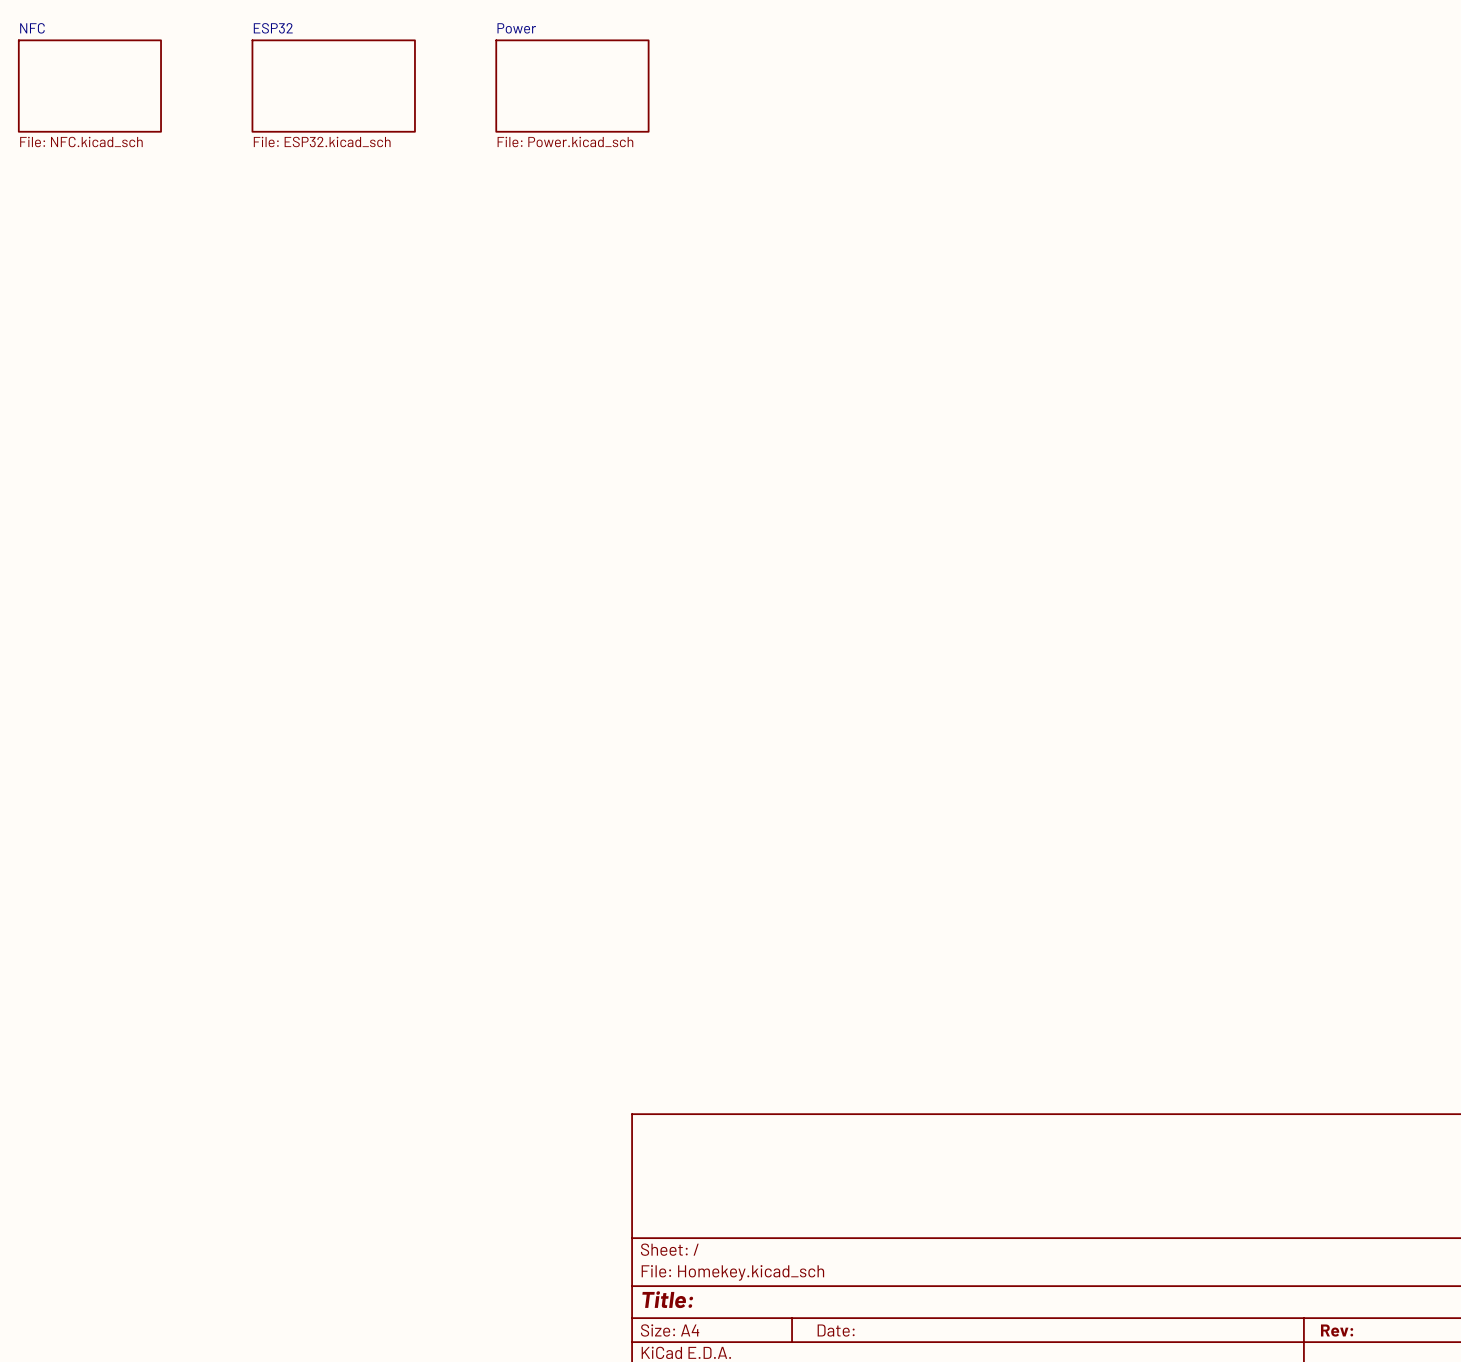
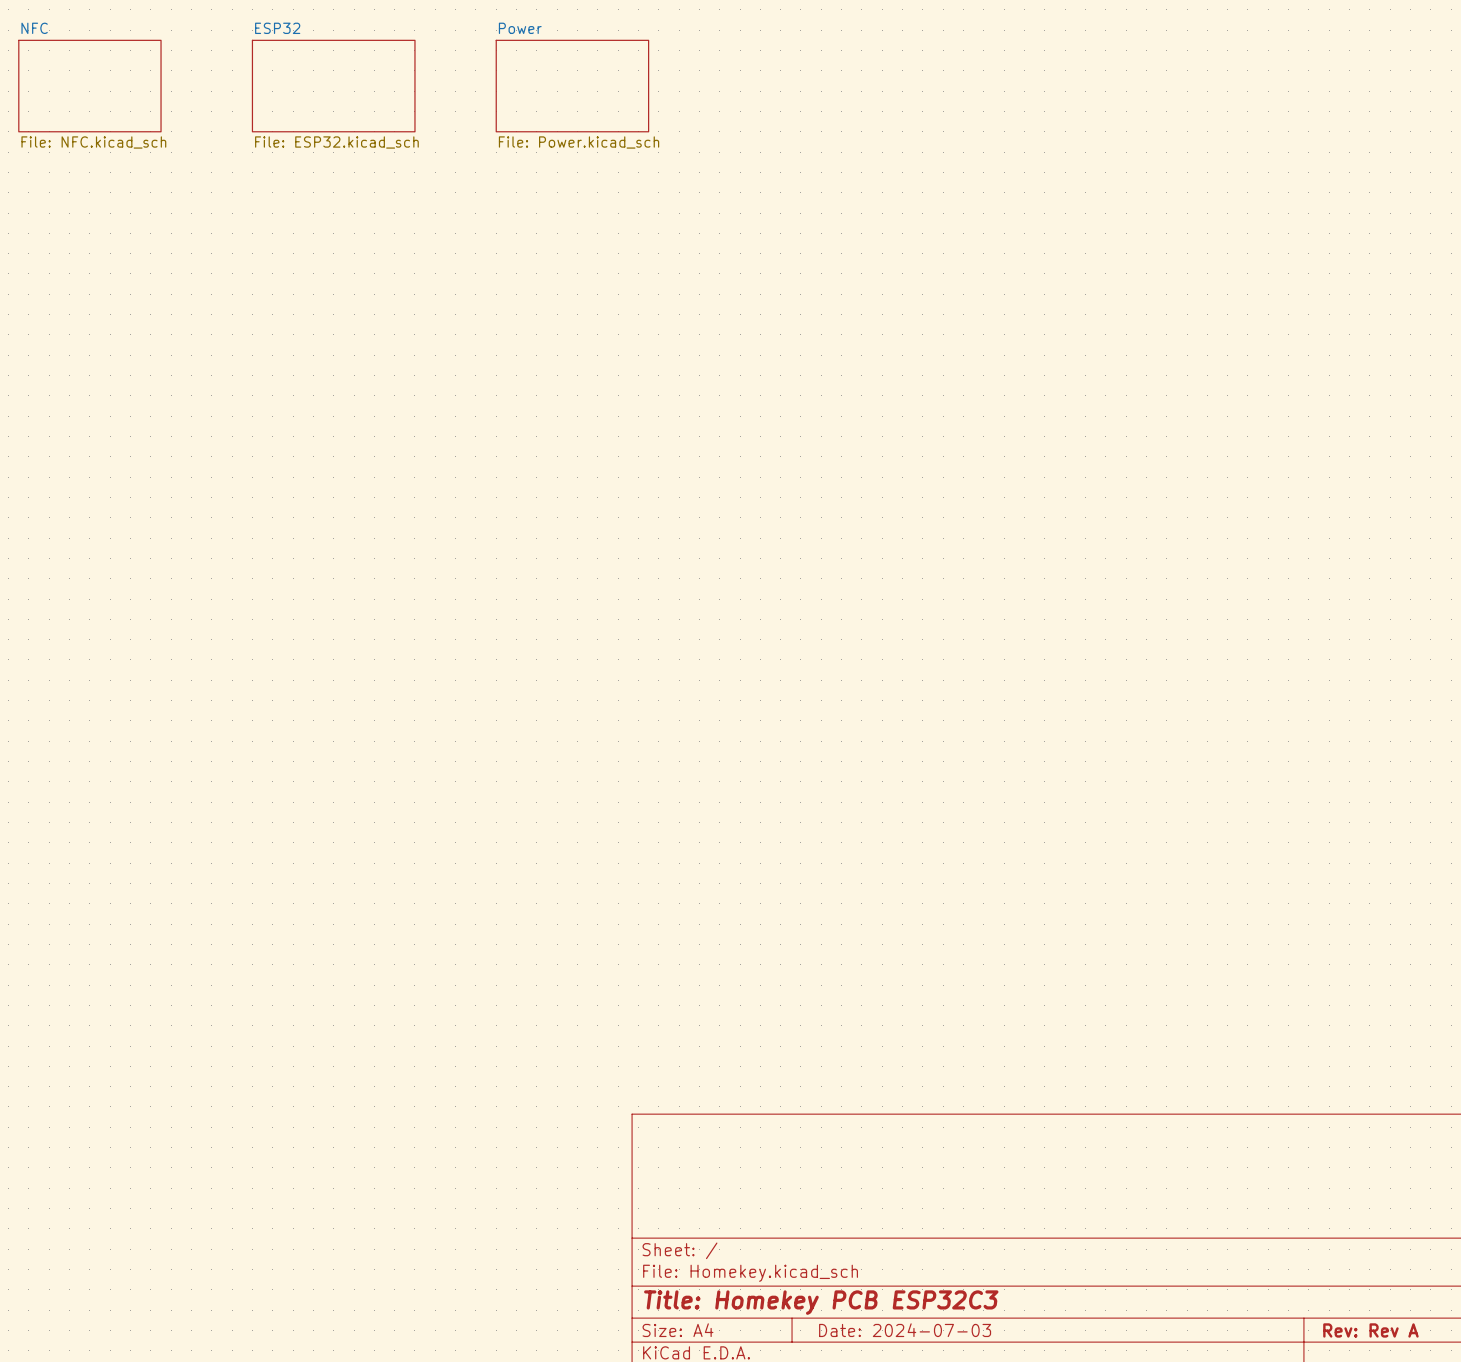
title block: Title: (667, 1299) -> Title: Homekey PCB ESP32C3 (821, 1302)
title block: Date: (836, 1330) -> Date: 2024-07-03 (905, 1330)
title block: Rev: (1337, 1330) -> Rev: Rev A (1370, 1330)

